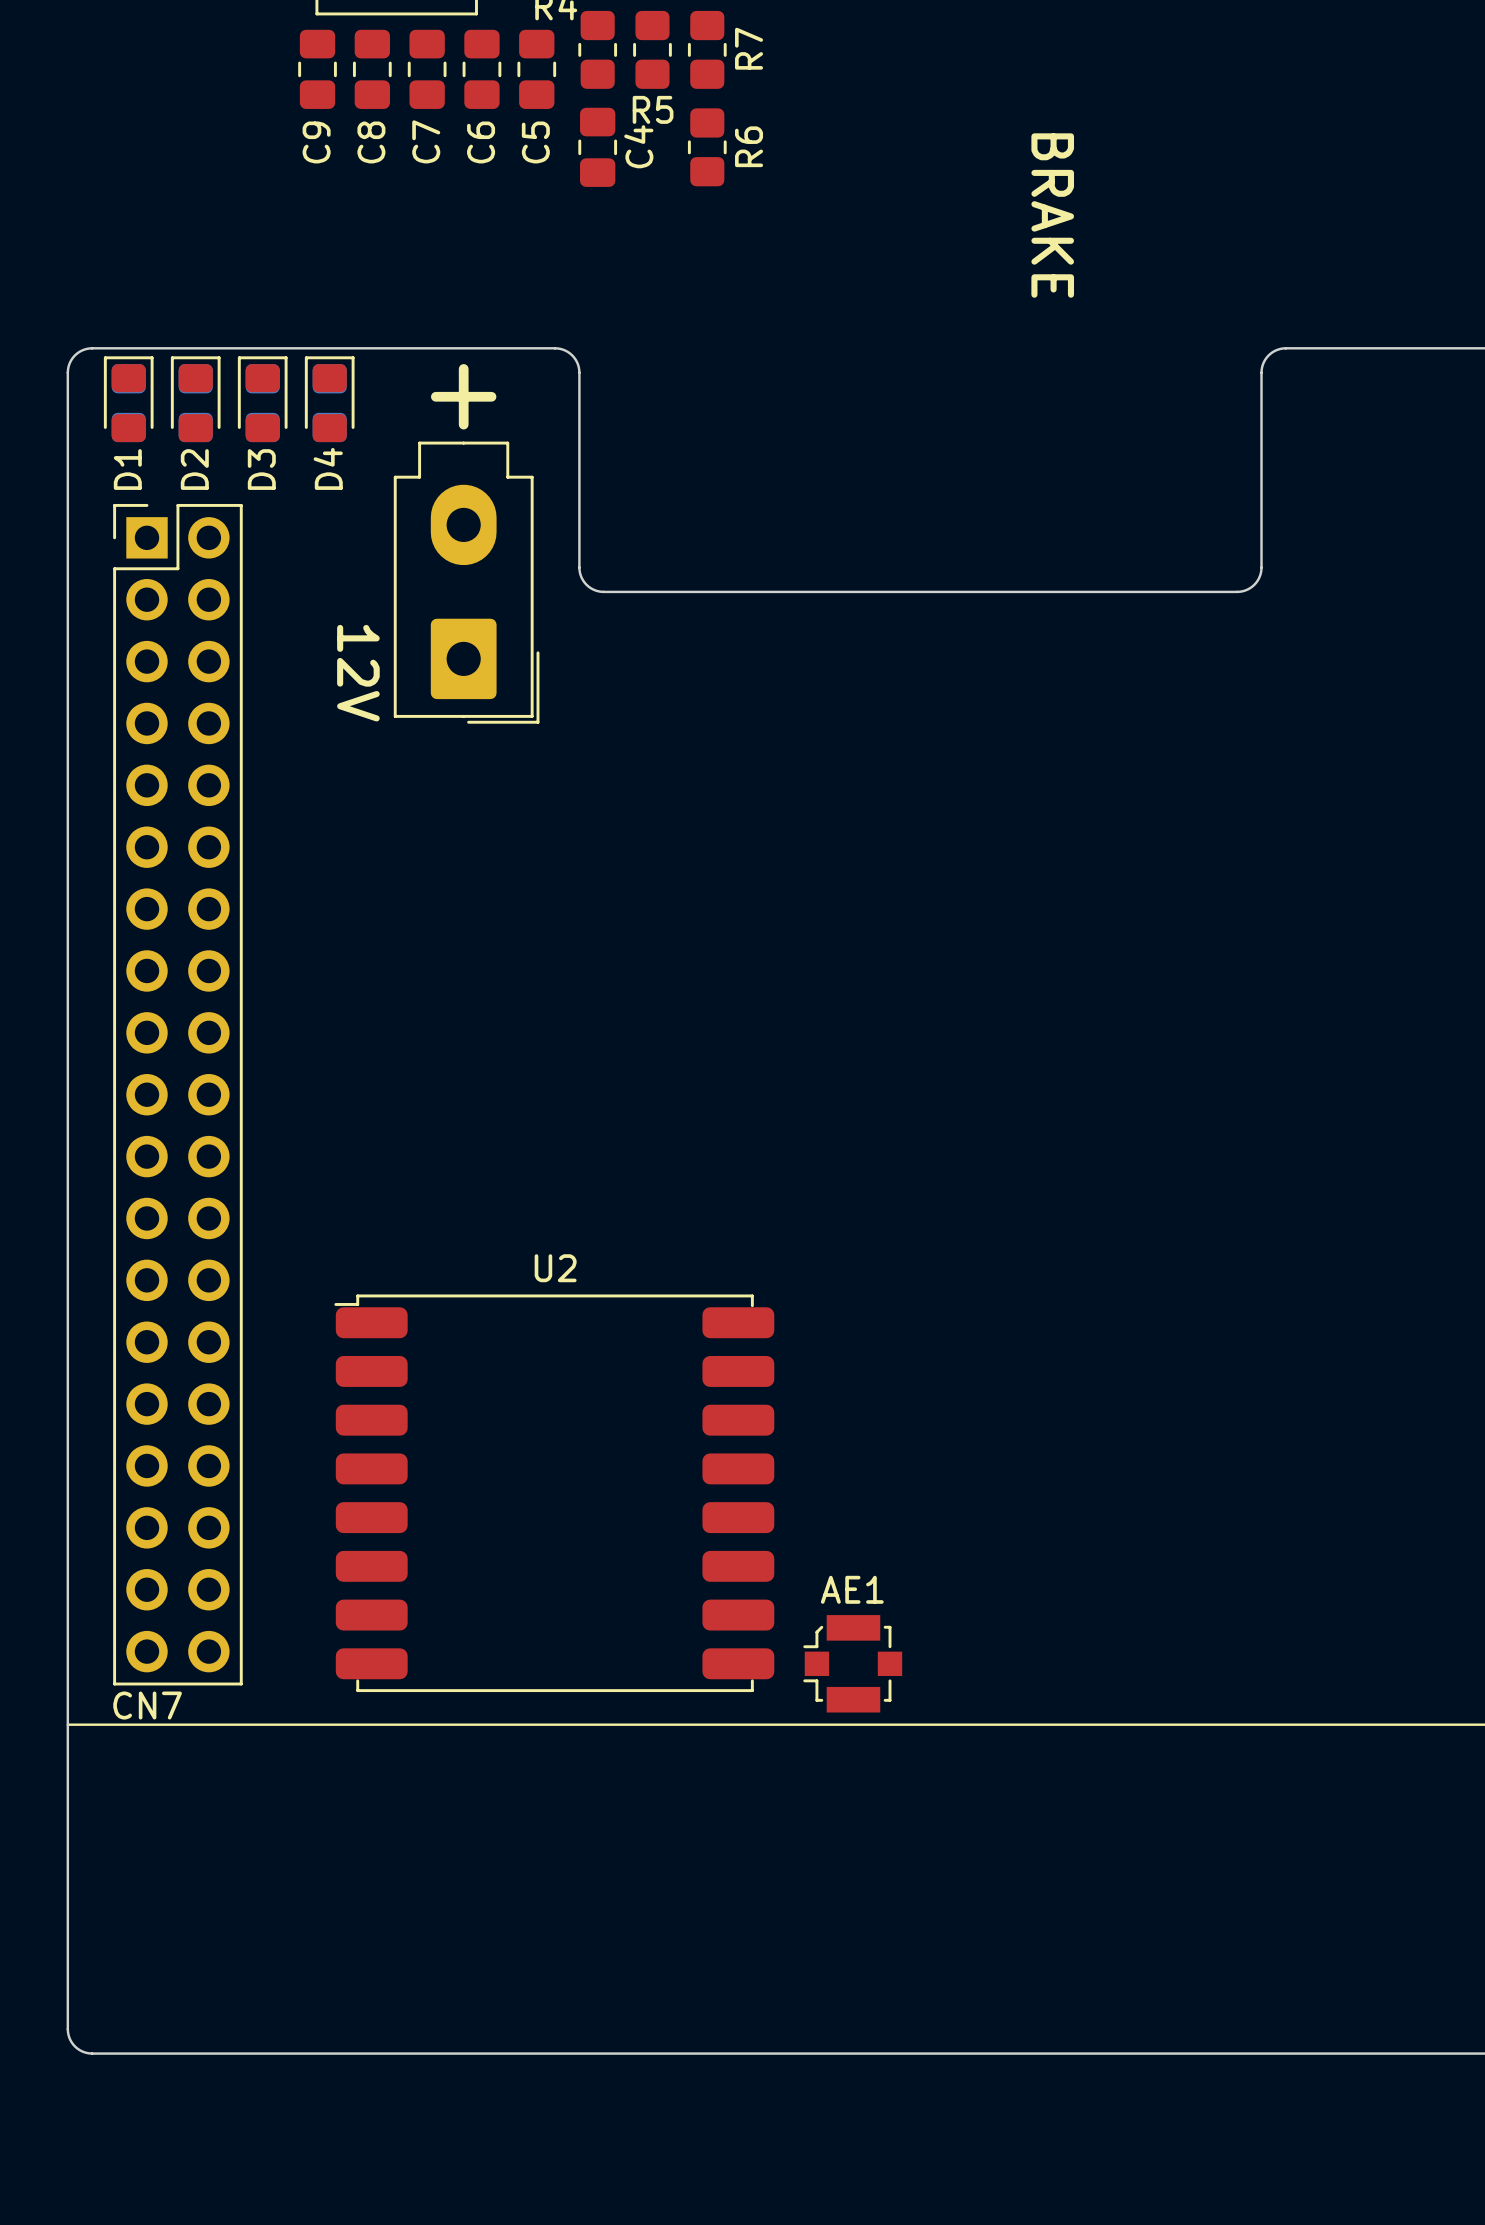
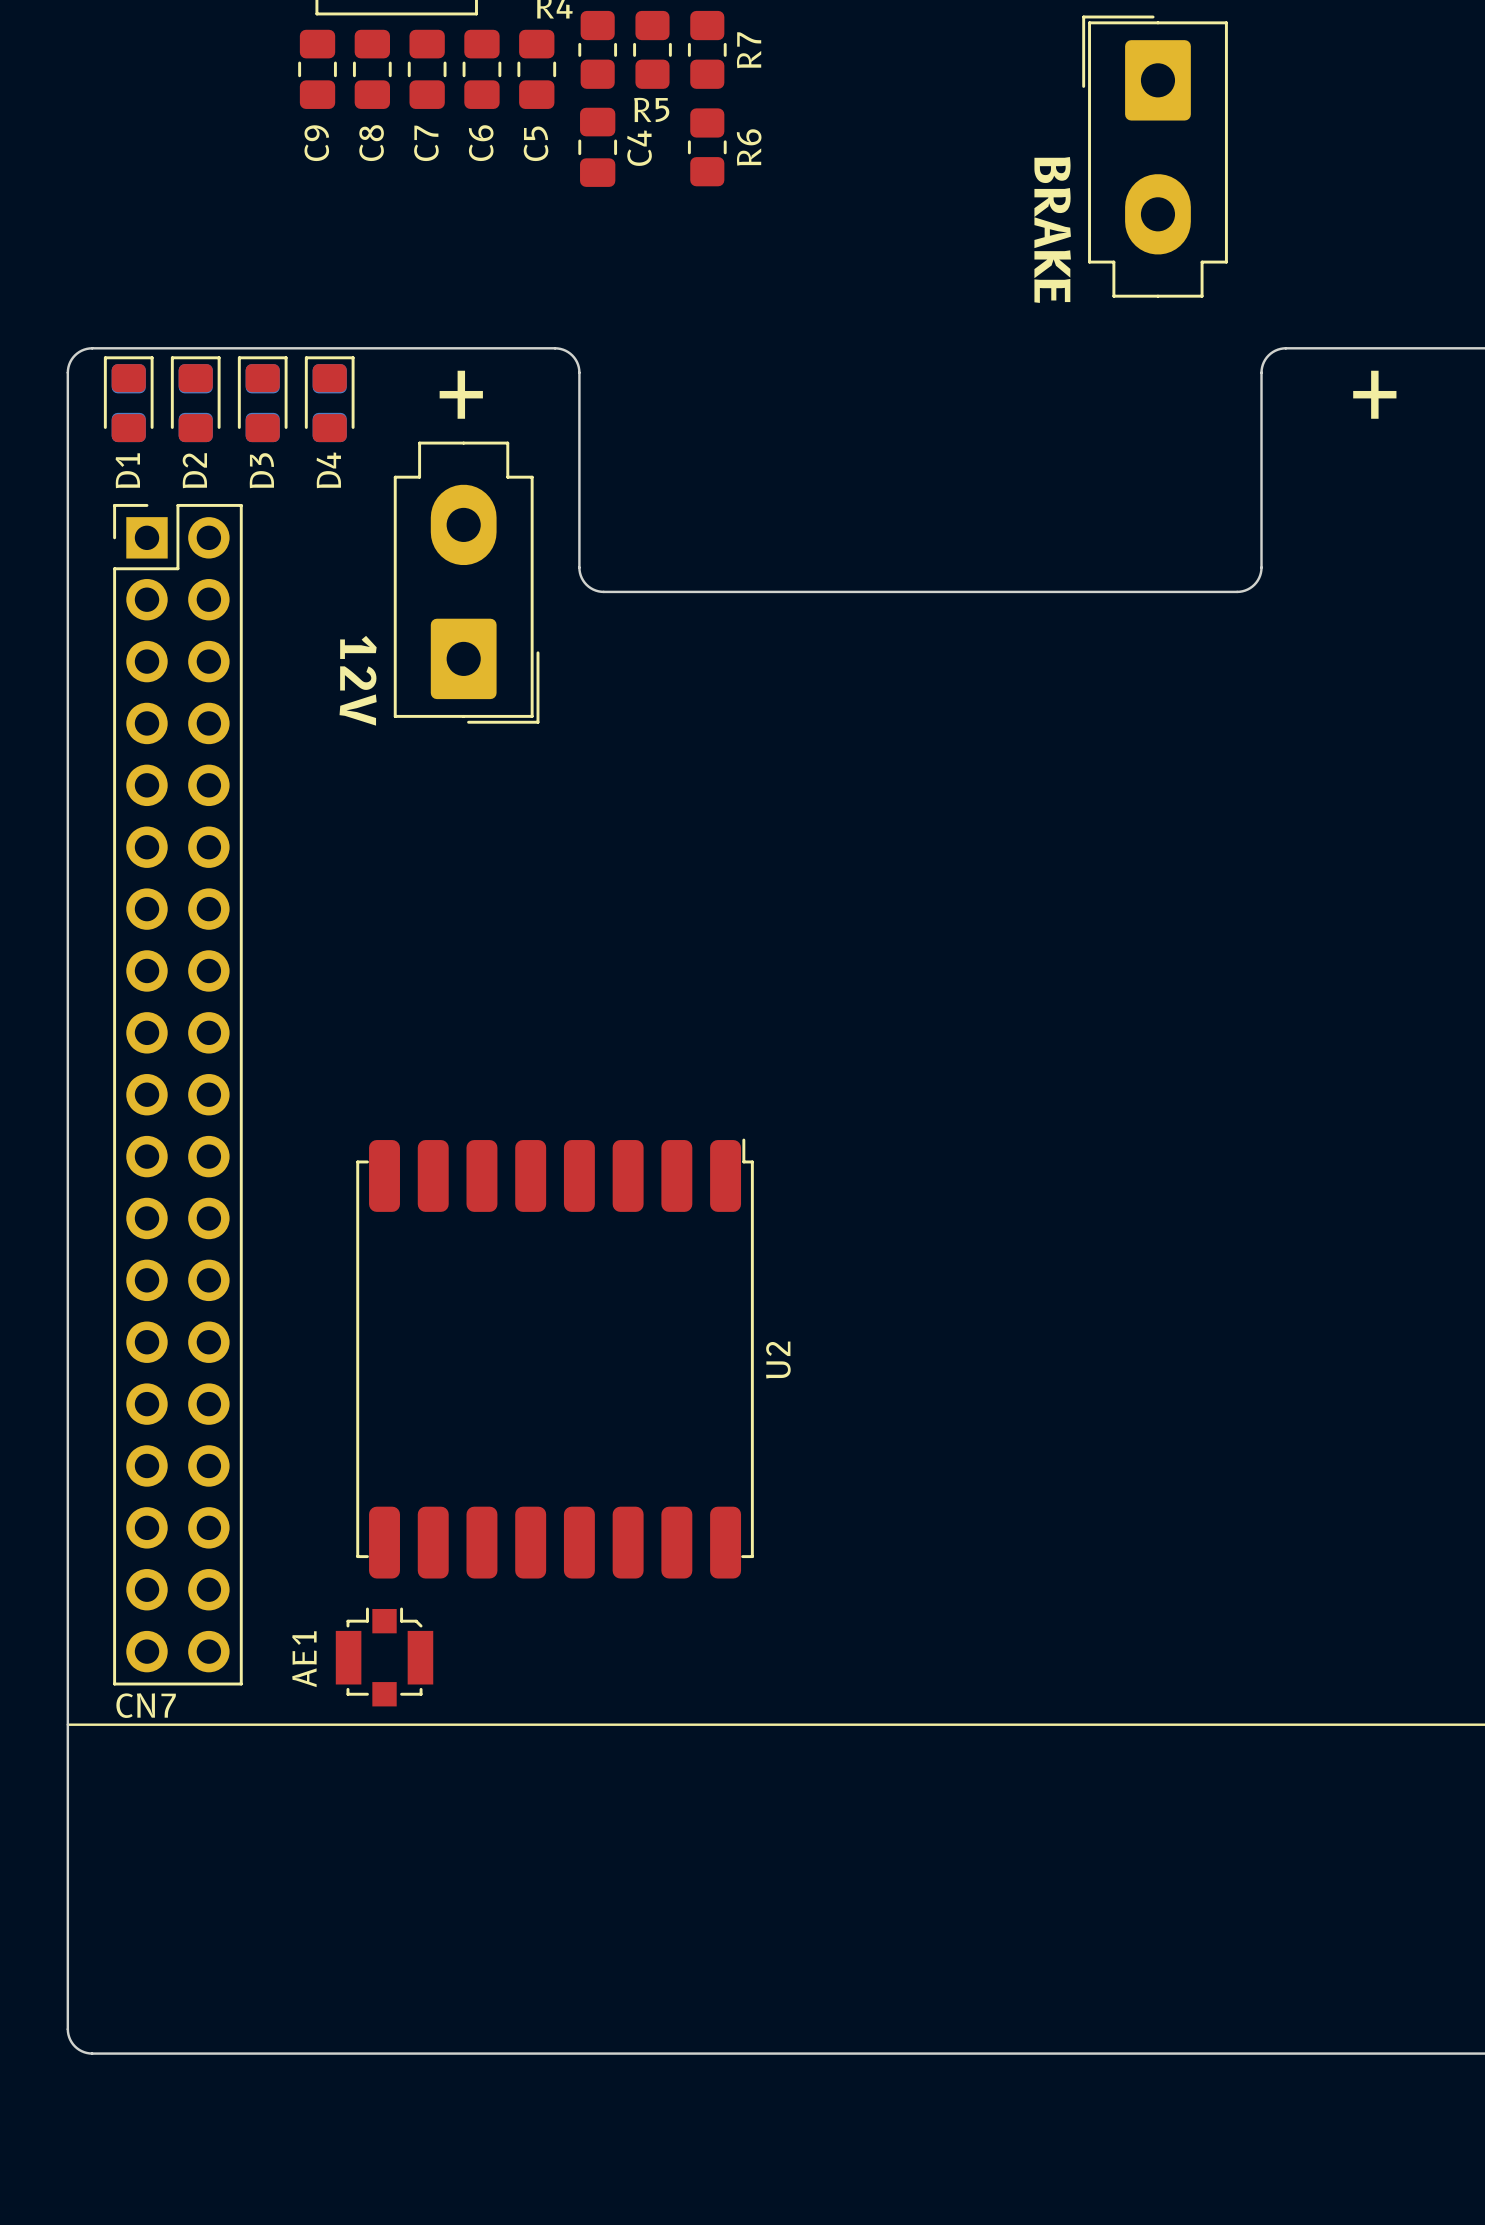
part: none -> (1155, 156)
text: none -> + (1374, 394)
U2 rotation: 0° (554, 1493) -> 90° clockwise (555, 1358)
AE1 name position: AE1 (852, 1589) -> AE1 (304, 1659)
AE1 rotation: 0° (852, 1663) -> 90° clockwise (384, 1656)
AE1 position: (852, 1663) -> (384, 1656)

